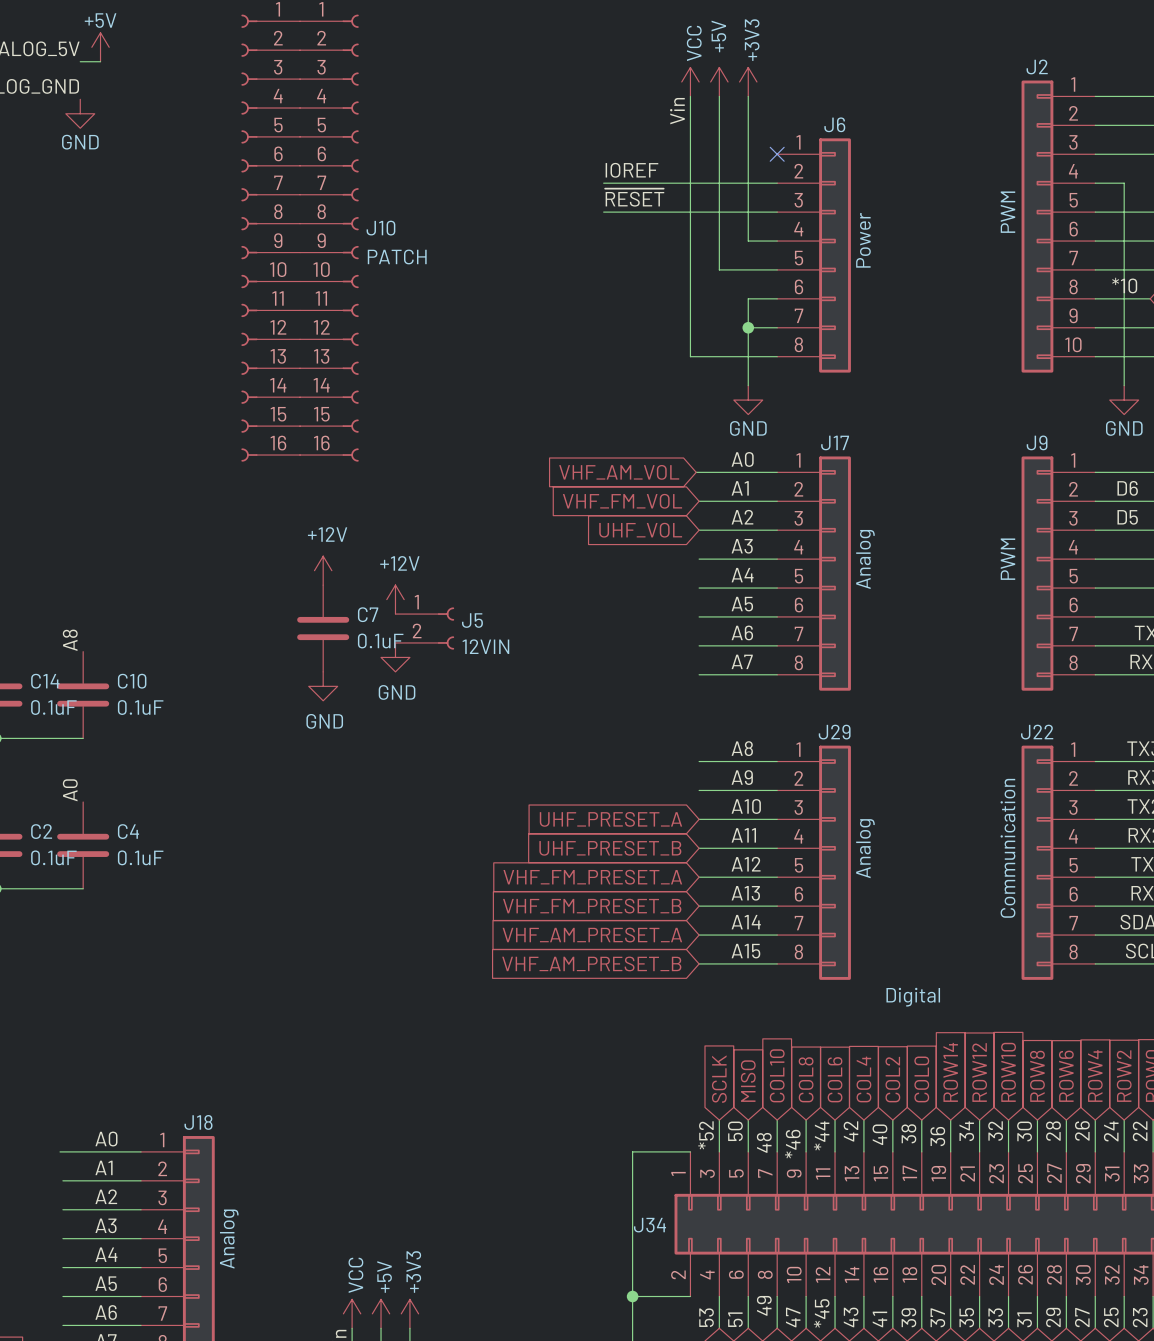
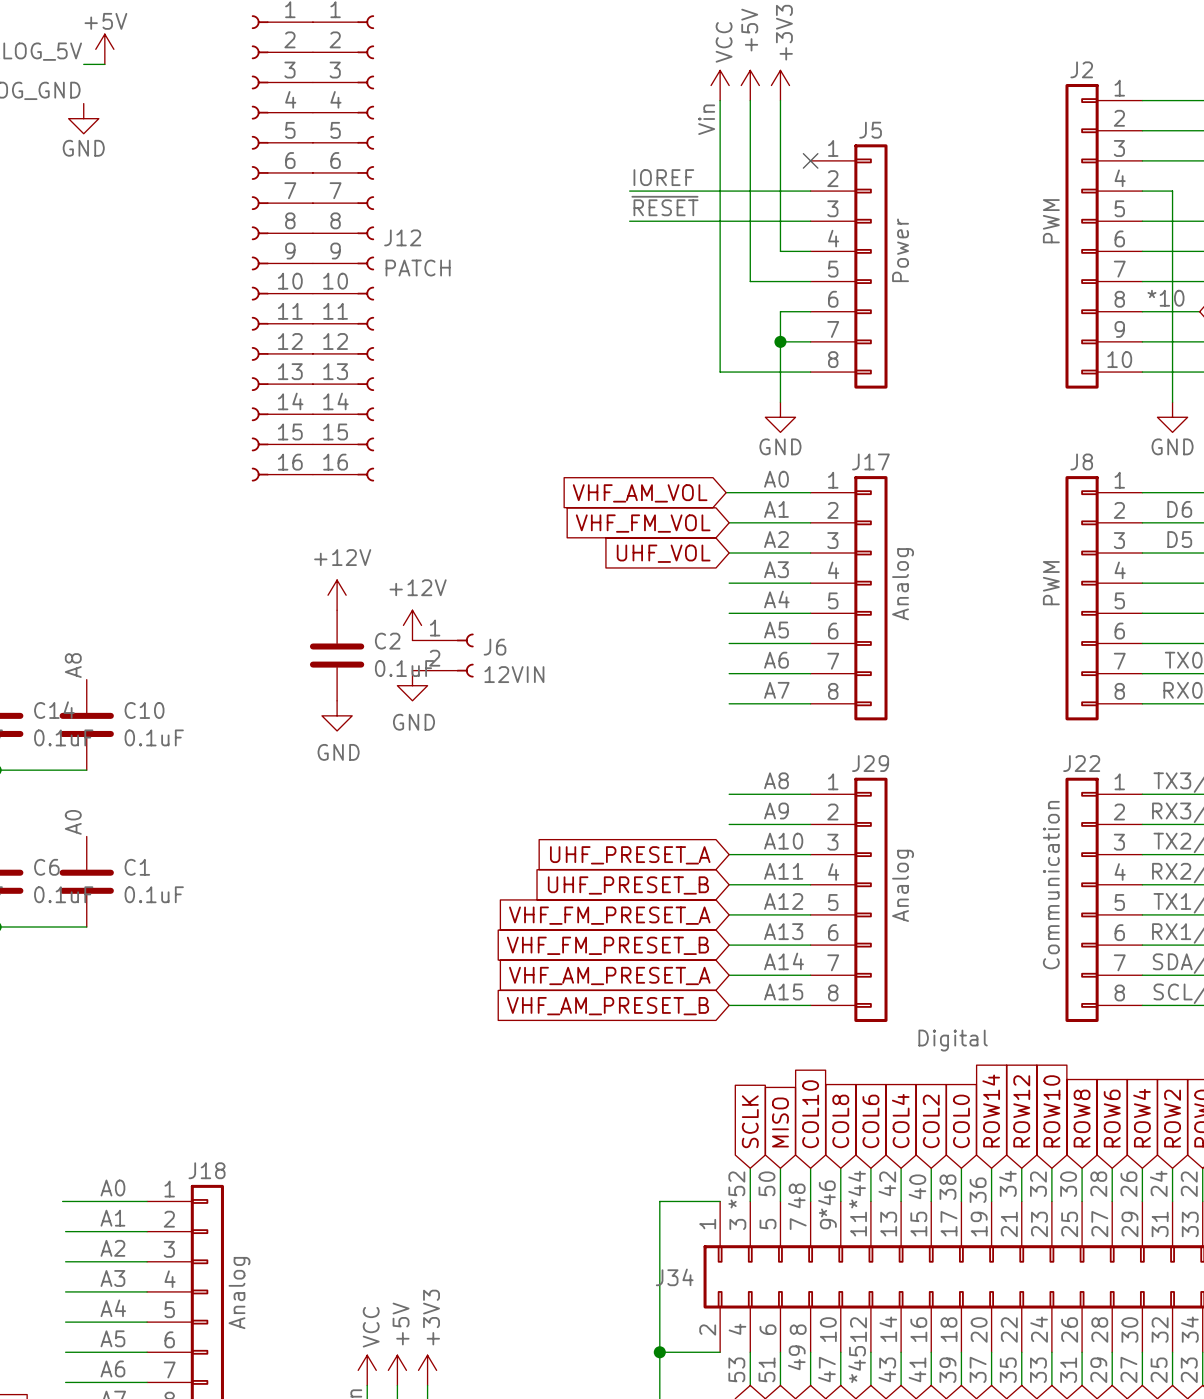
J6 name: J6 (834, 124) -> J5 (870, 130)
J10 name: J10 (380, 228) -> J12 (402, 237)
J9 name: J9 (1037, 442) -> J8 (1081, 461)
C7 name: C7 (368, 614) -> C2 (387, 641)
J5 name: J5 (472, 620) -> J6 (495, 647)
C2 name: C2 (41, 831) -> C6 (46, 867)
C4 name: C4 (128, 831) -> C1 (137, 867)

